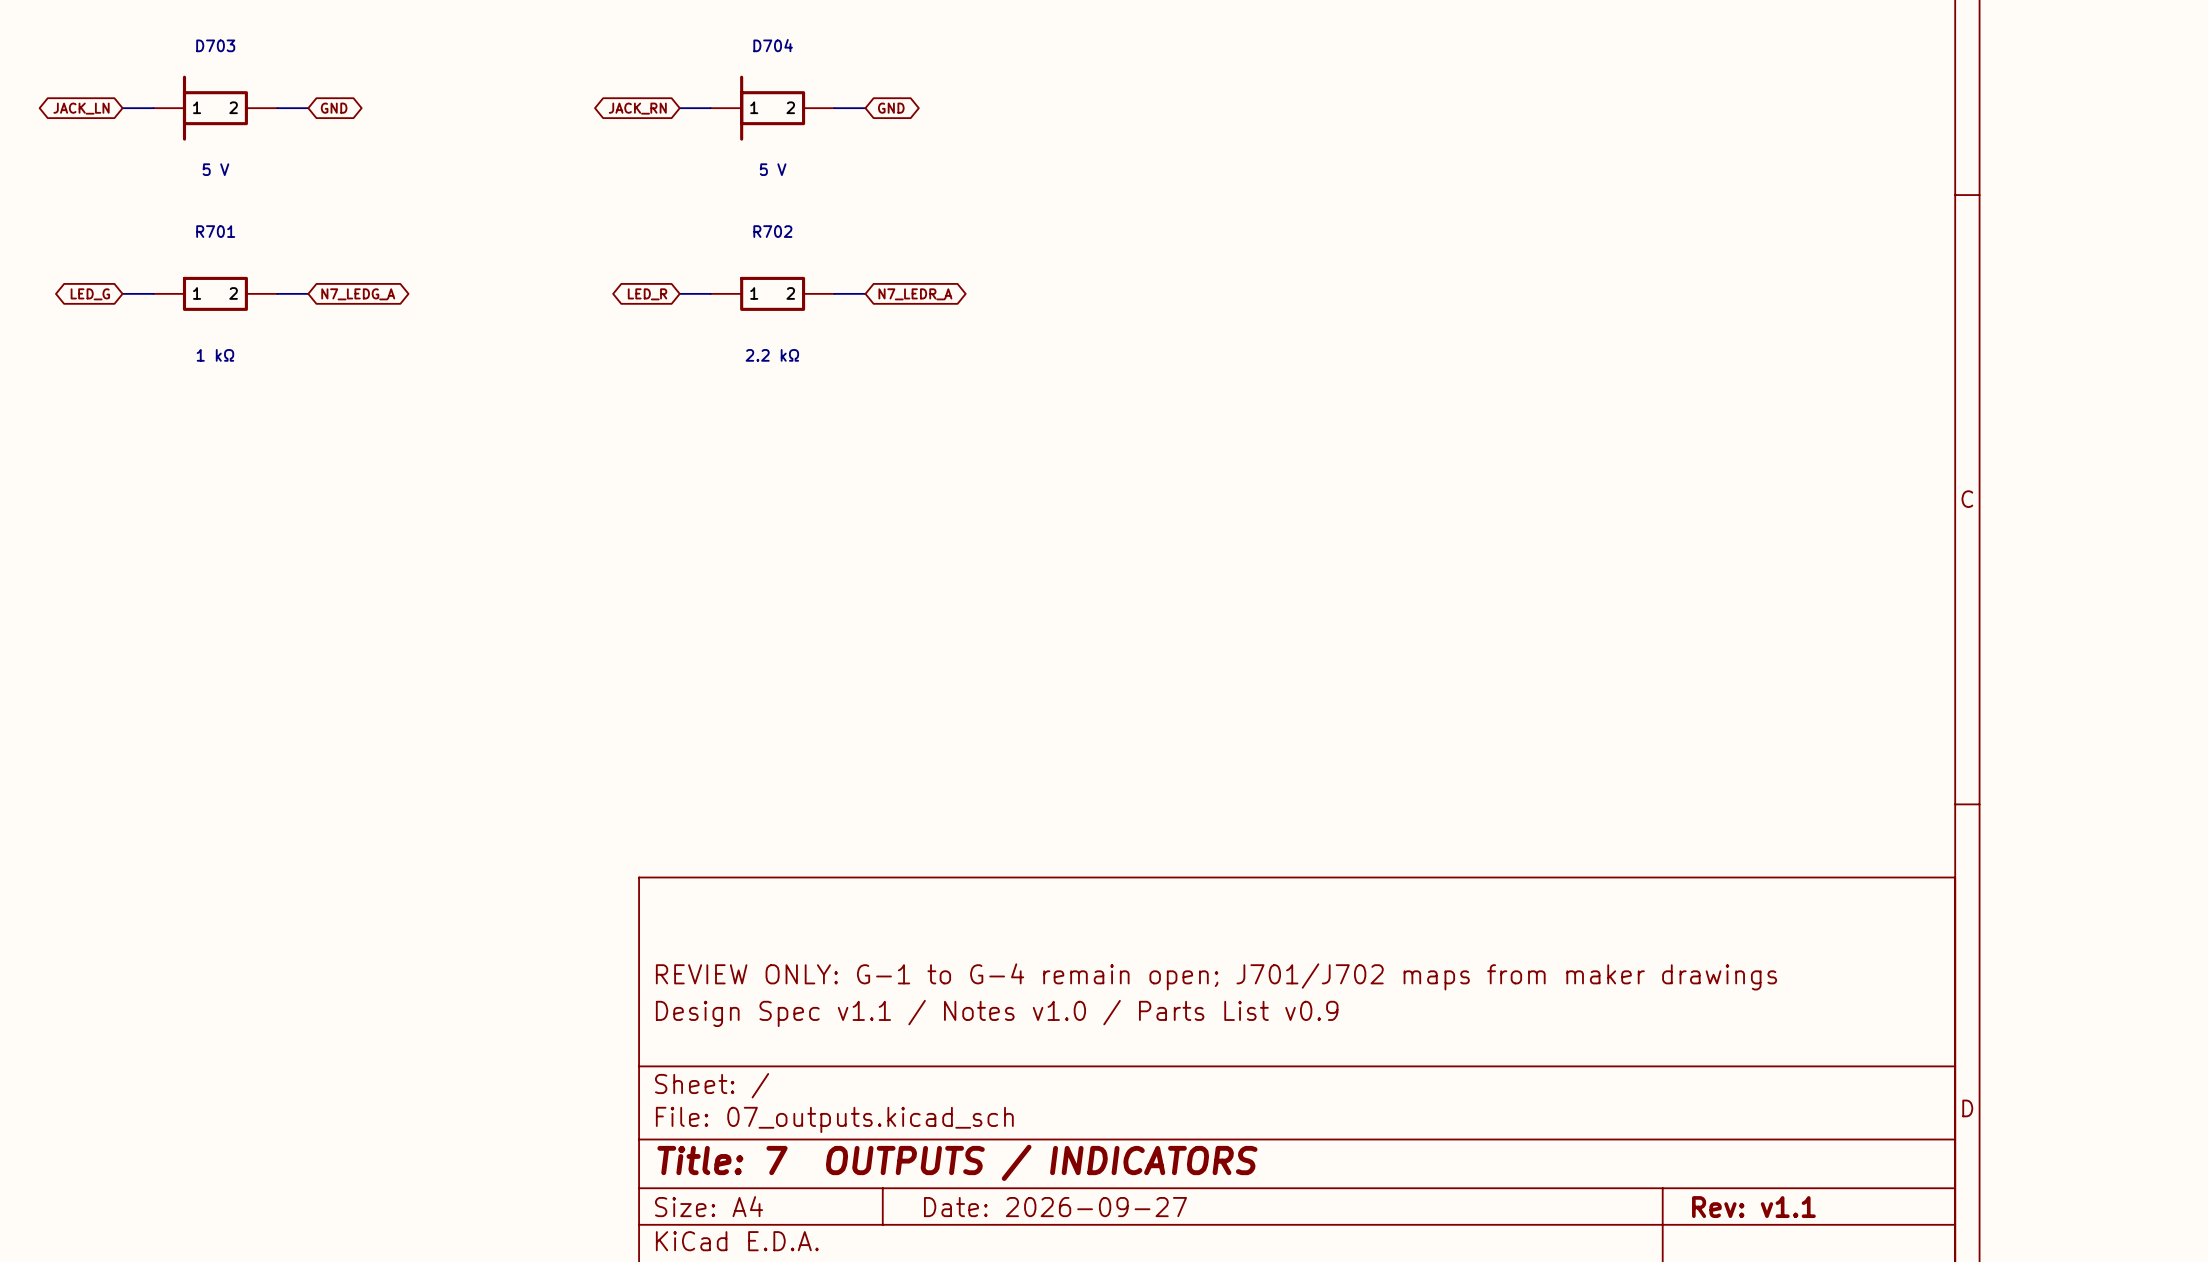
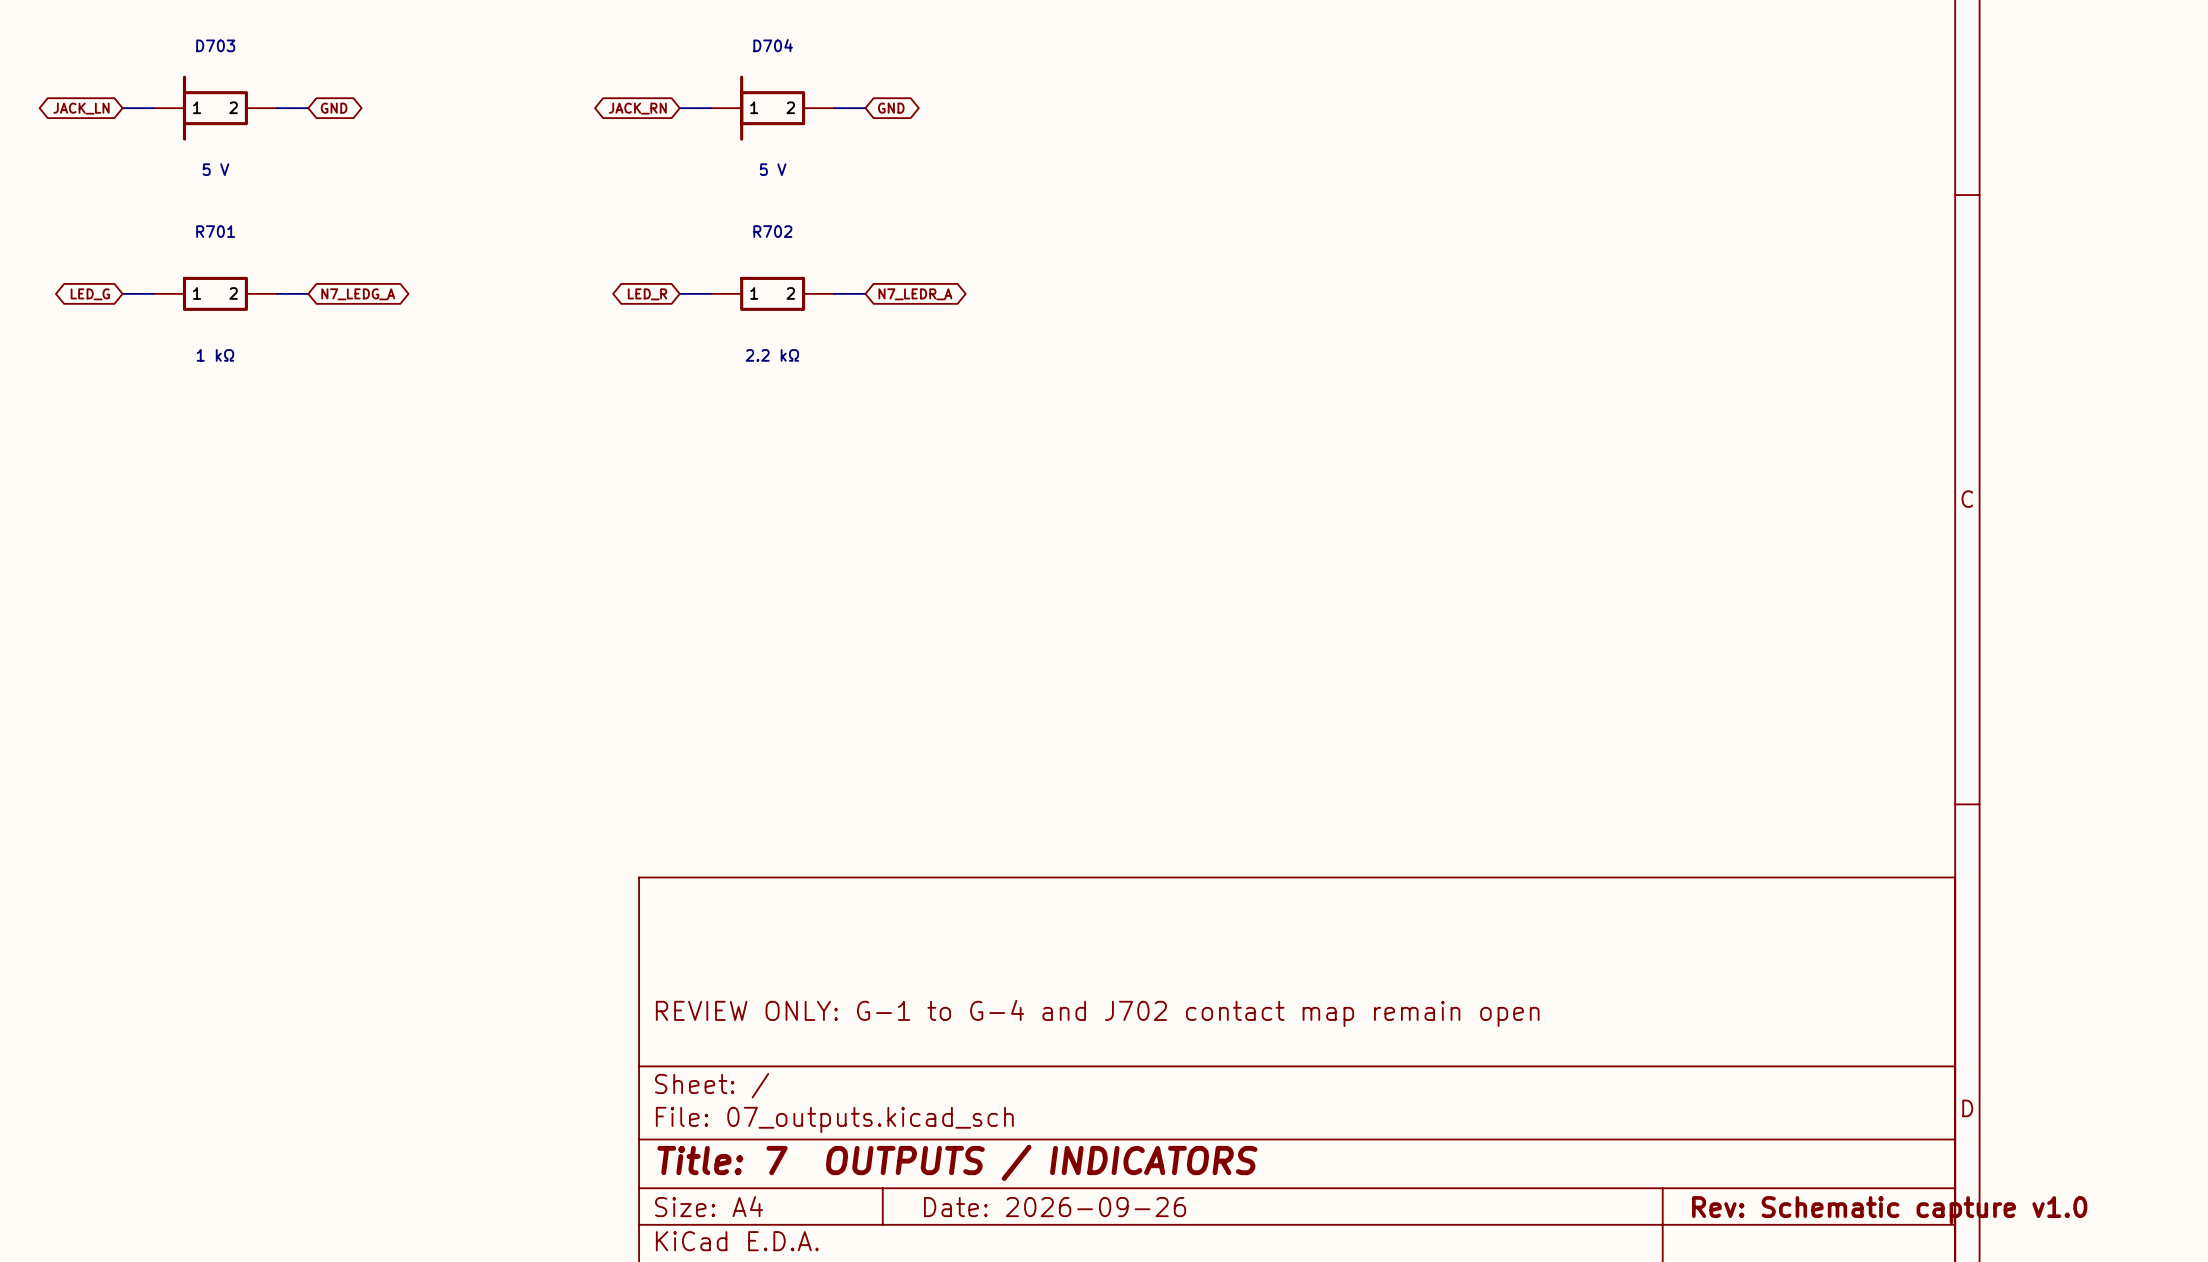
title block: REVIEW ONLY: G-1 to G-4 remain open; J701/J702 maps from maker drawings (1216, 976) -> none
title block: Design Spec v1.1 / Notes v1.0 / Parts List v0.9 (997, 1013) -> REVIEW ONLY: G-1 to G-4 and J702 contact map remain open (1097, 1013)
title block: Date: 2026-09-27 (1055, 1207) -> Date: 2026-09-26 (1055, 1207)
title block: Rev: v1.1 (1753, 1207) -> Rev: Schematic capture v1.0 (1889, 1210)

